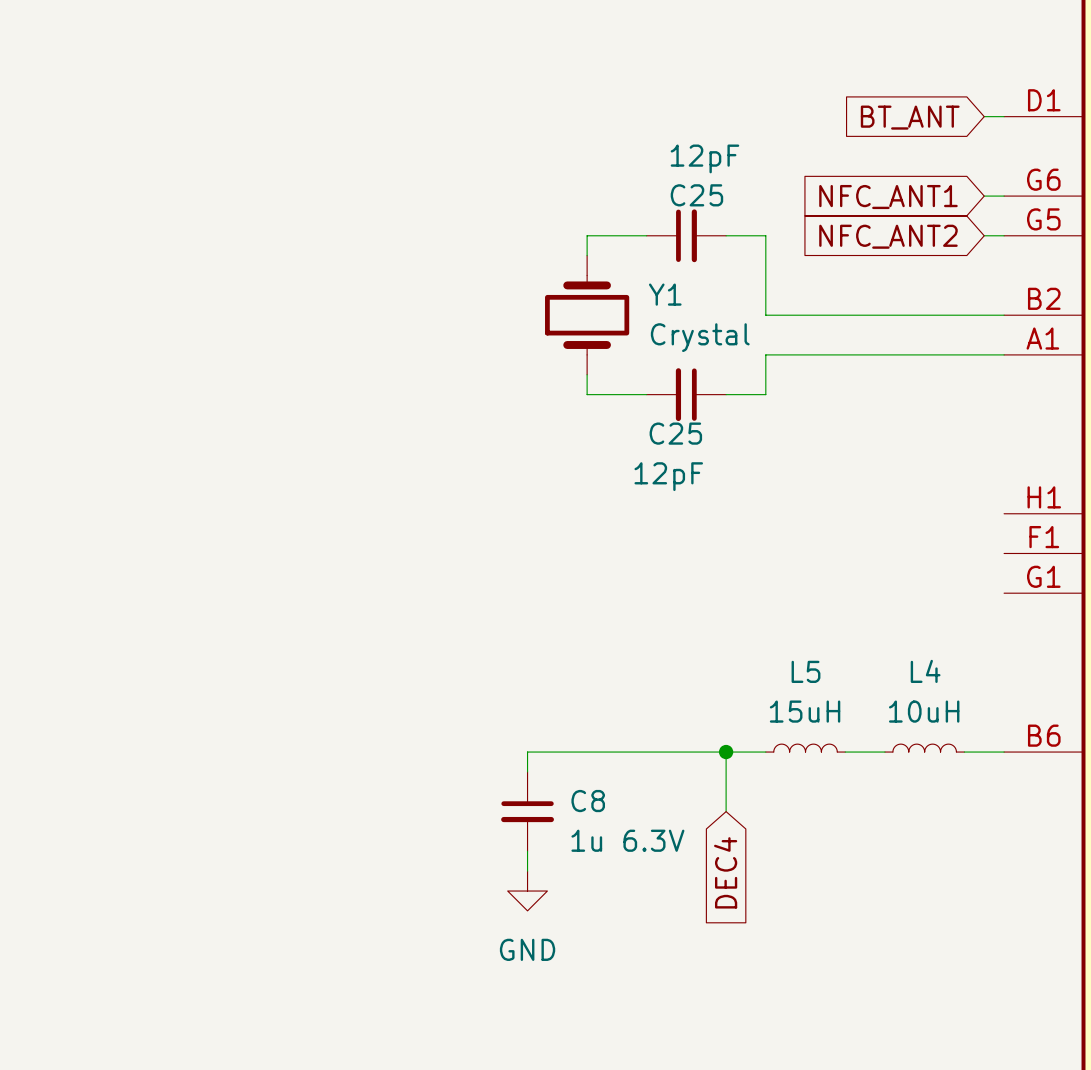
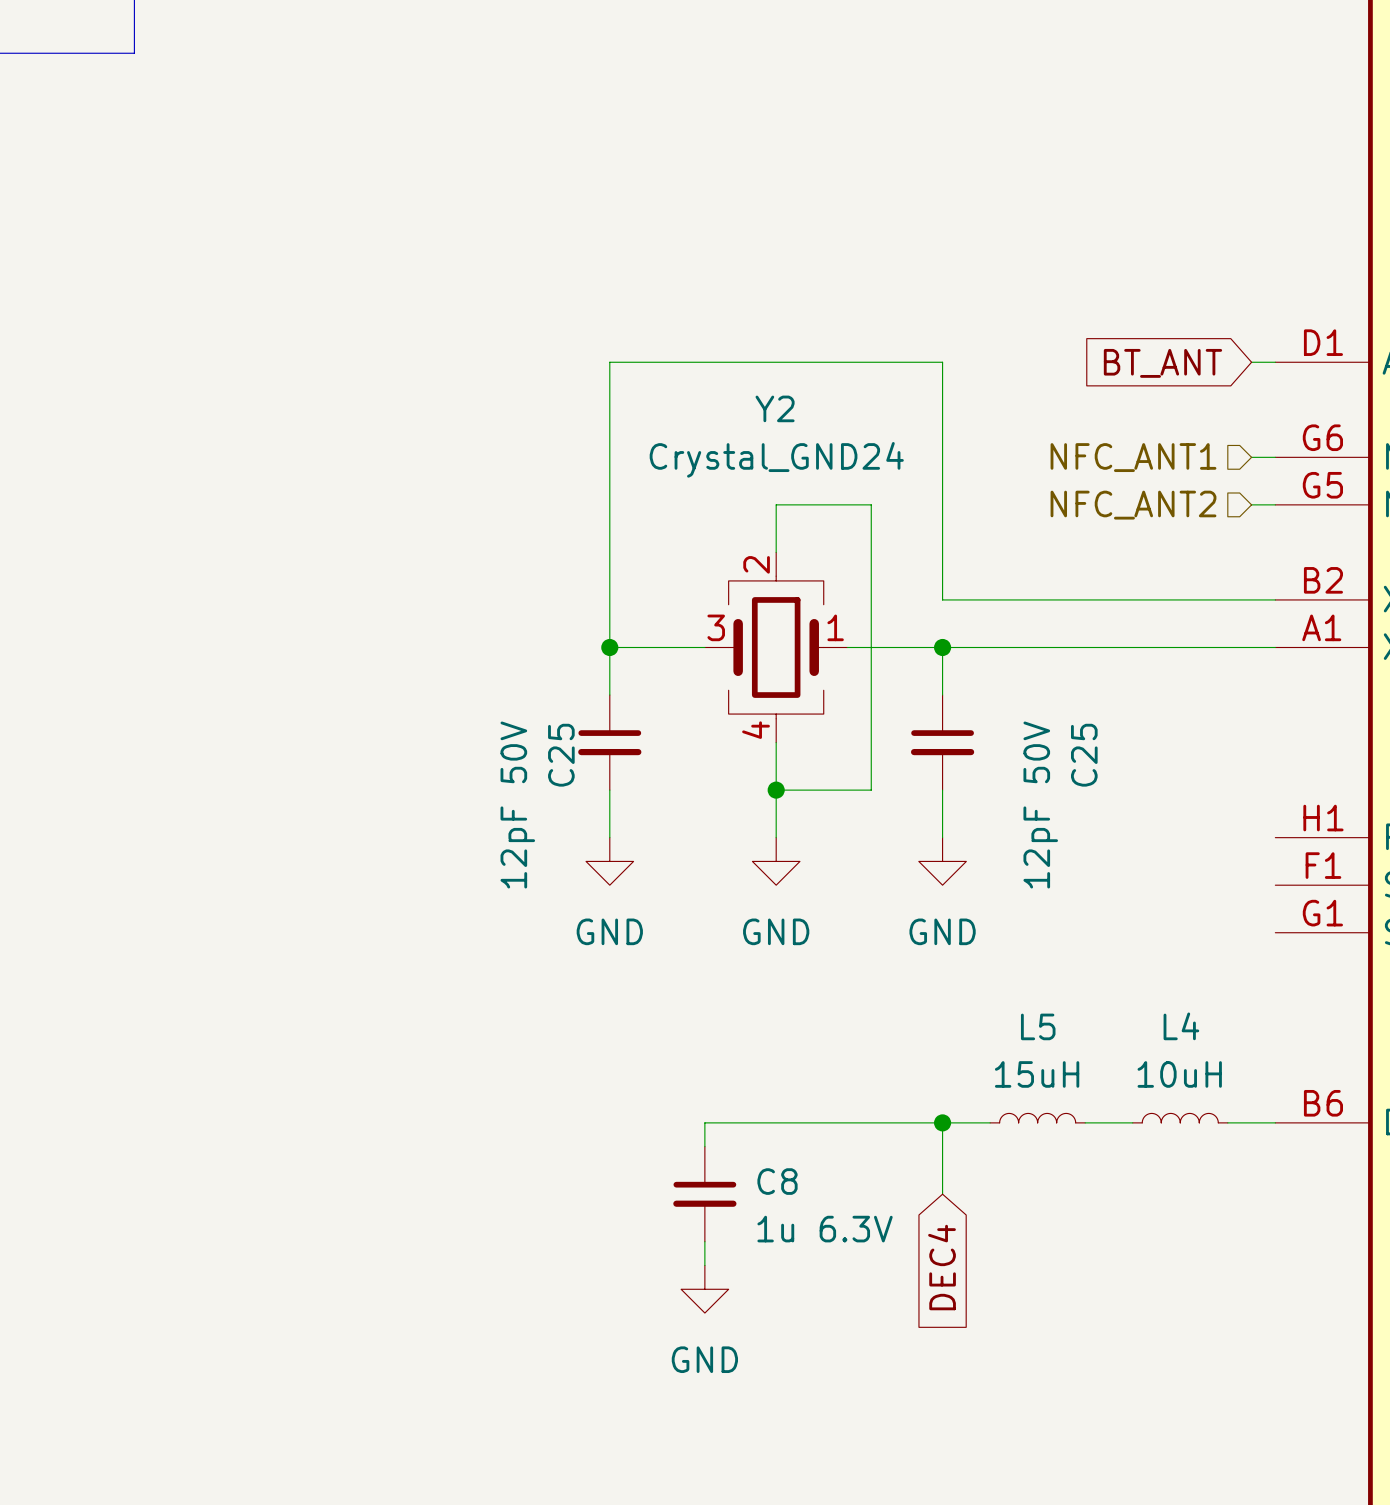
hierarchical label: none -> NFC_ANT1 (1133, 457)
global label: NFC_ANT1 (888, 197) -> none
wire: none -> (847, 504) (871, 504) (871, 790) (776, 790)
C25: 12pF (686, 235) -> none
wire: (726, 235) (765, 235) (765, 315) -> (609, 695) (609, 362) (942, 362) (942, 599) (990, 599)
hierarchical label: none -> NFC_ANT2 (1133, 505)
global label: NFC_ANT2 (888, 236) -> none
Y1: Crystal (587, 315) -> none
wire: none -> (609, 647) (704, 647)
junction: none -> (609, 647)
Y2: none -> Crystal_GND24 (776, 647)
wire: none -> (847, 647) (990, 647)
junction: none -> (942, 647)
wire: (765, 354) (765, 394) (726, 394) -> (942, 647) (942, 695)
wire: (587, 374) (587, 394) (646, 394) -> none
C25: 12pF (686, 394) -> none
C25: none -> 12pF 50V (609, 742)
wire: none -> (776, 742) (776, 837)
C25: none -> 12pF 50V (942, 742)
wire: none -> (609, 790) (609, 837)
junction: none -> (776, 790)
wire: none -> (942, 790) (942, 837)
power symbol: none -> GND (609, 861)
power symbol: none -> GND (776, 861)
power symbol: none -> GND (942, 861)

